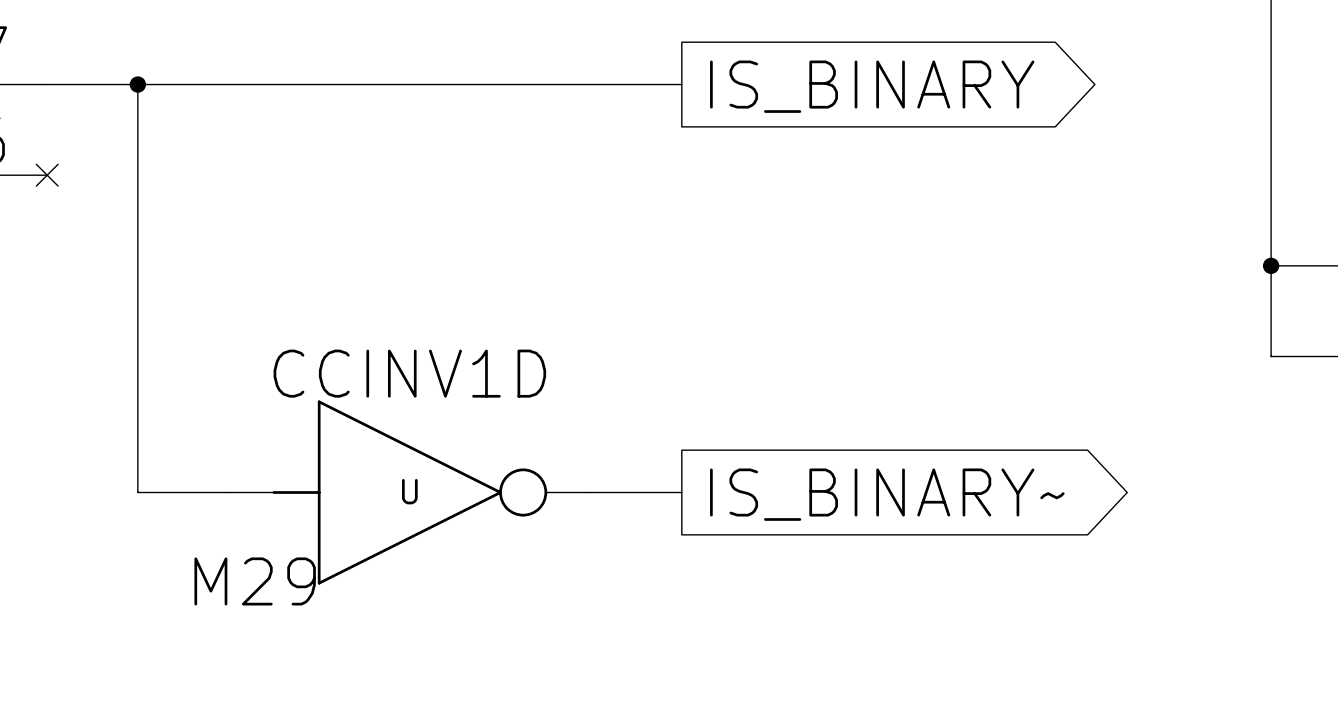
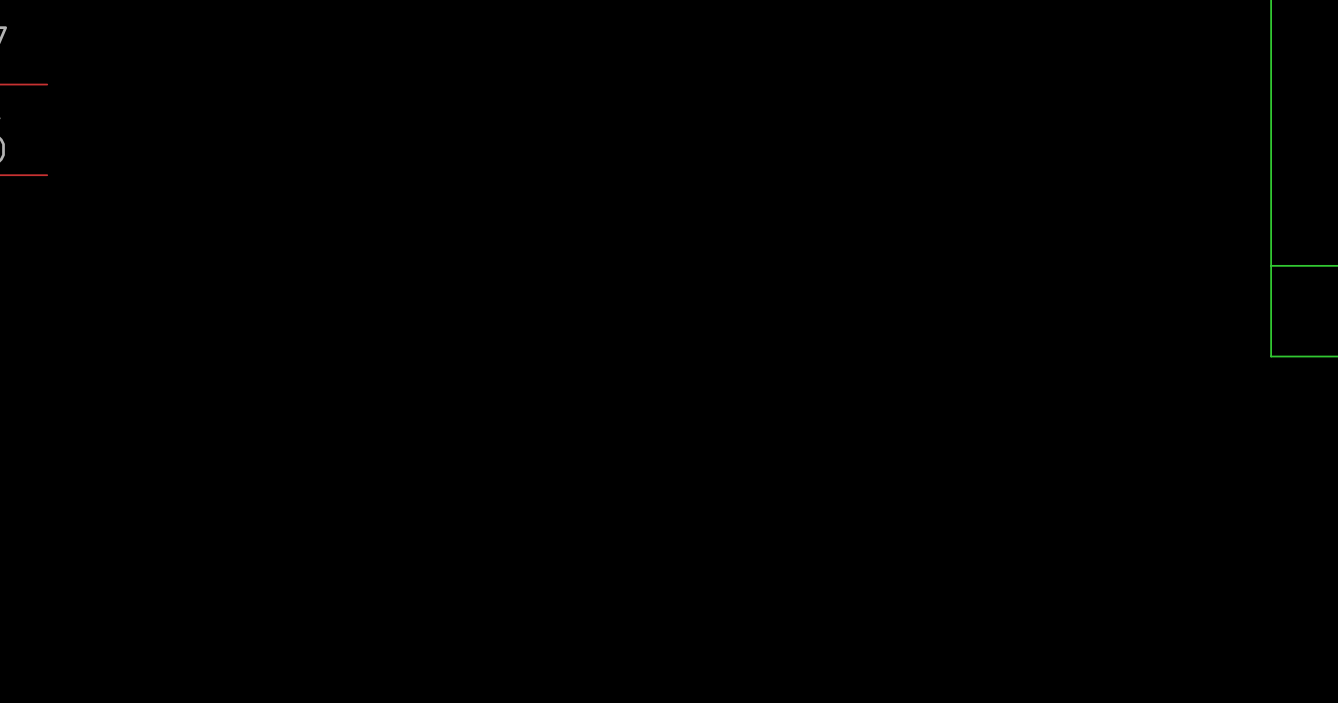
wire: (47, 84) (681, 84) -> none
wire: (137, 84) (137, 492) (228, 492) -> none
junction: (137, 84) -> none
global label: IS_BINARY (872, 86) -> none
no-connect mark: (47, 175) -> none
junction: (1271, 265) -> none
U: (409, 492) -> none
wire: (591, 492) (681, 492) -> none
global label: IS_BINARY~ (887, 494) -> none

